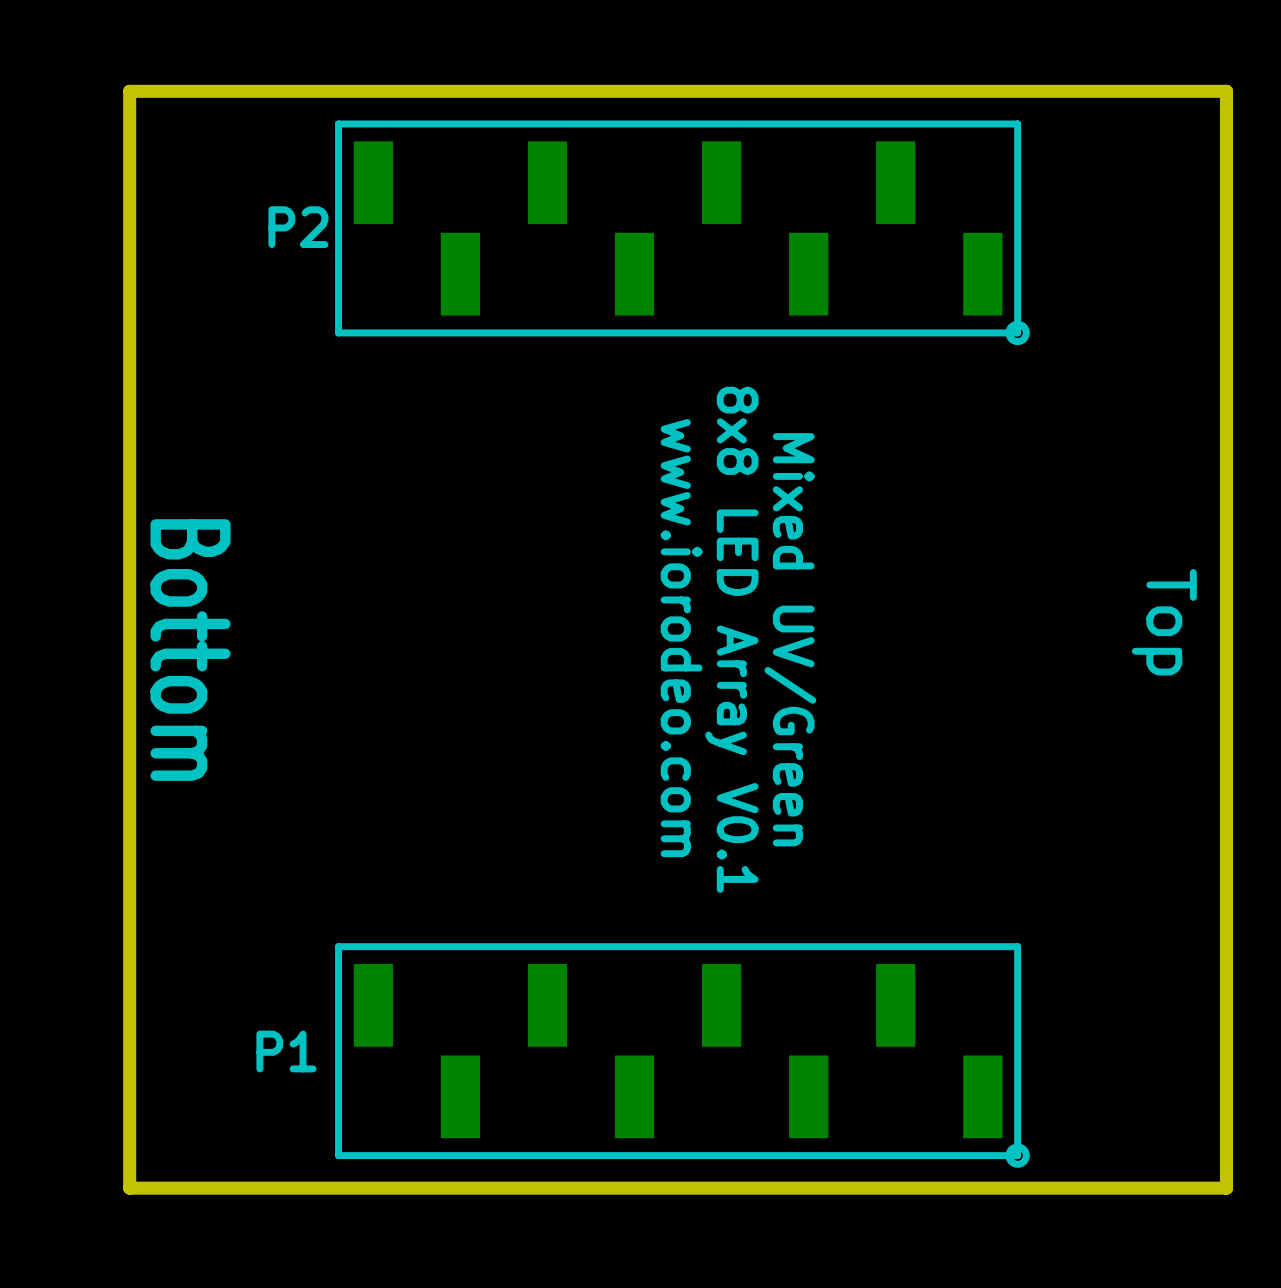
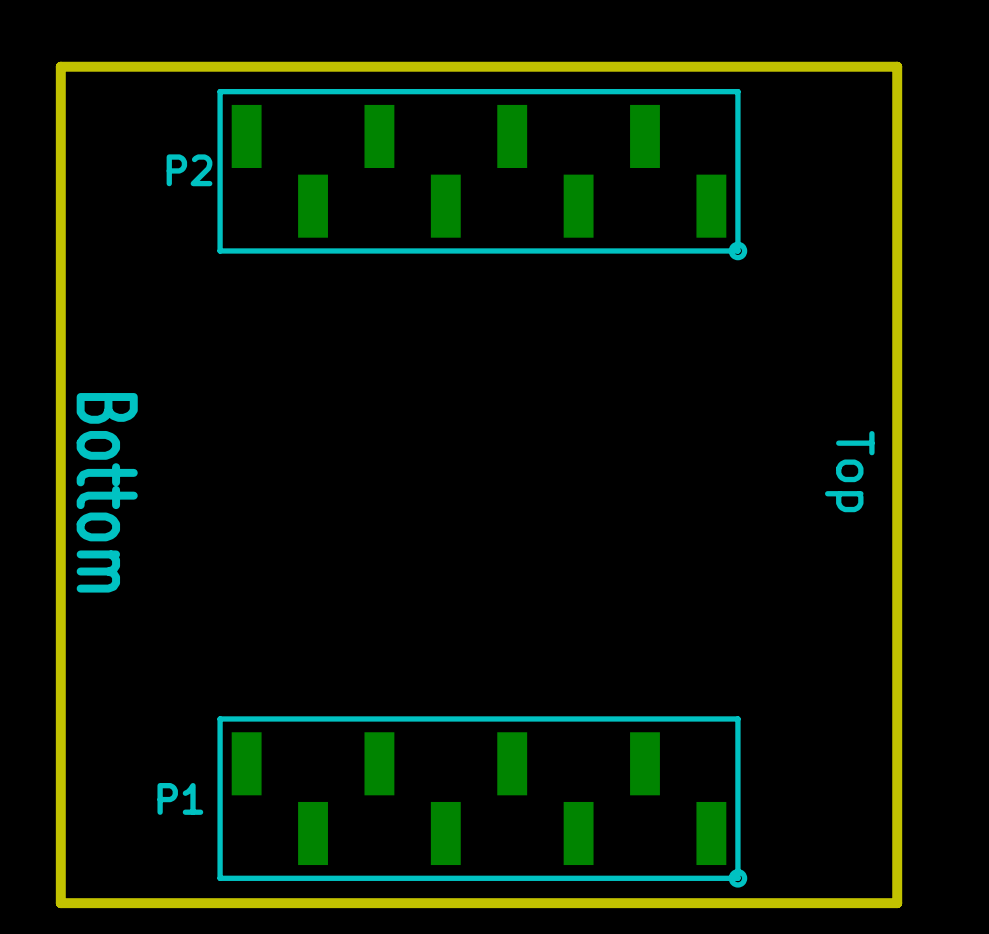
text: www.iorodeo.com (681, 638) -> none
text: 8x8 LED Array V0.1 (731, 639) -> none
text: Mixed UV/Green (790, 639) -> none

